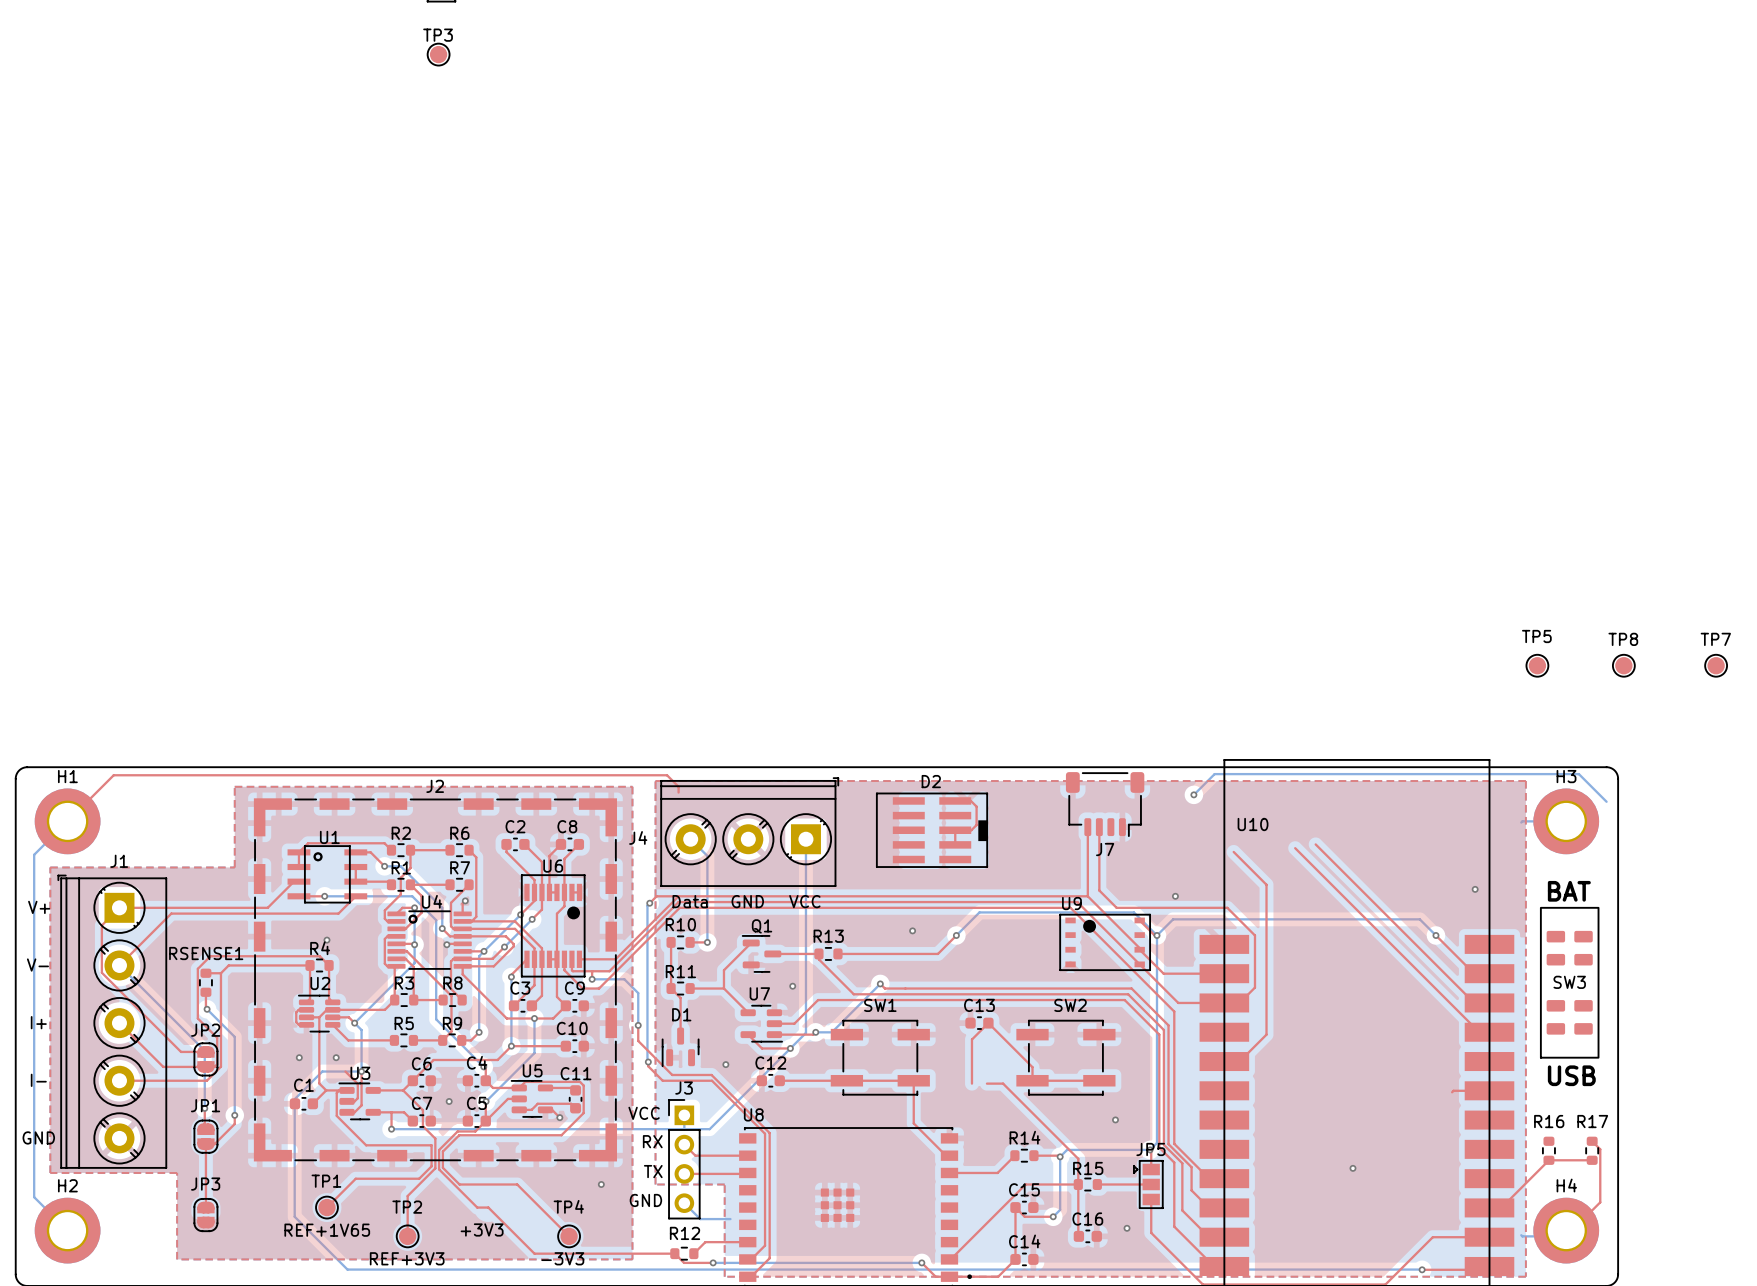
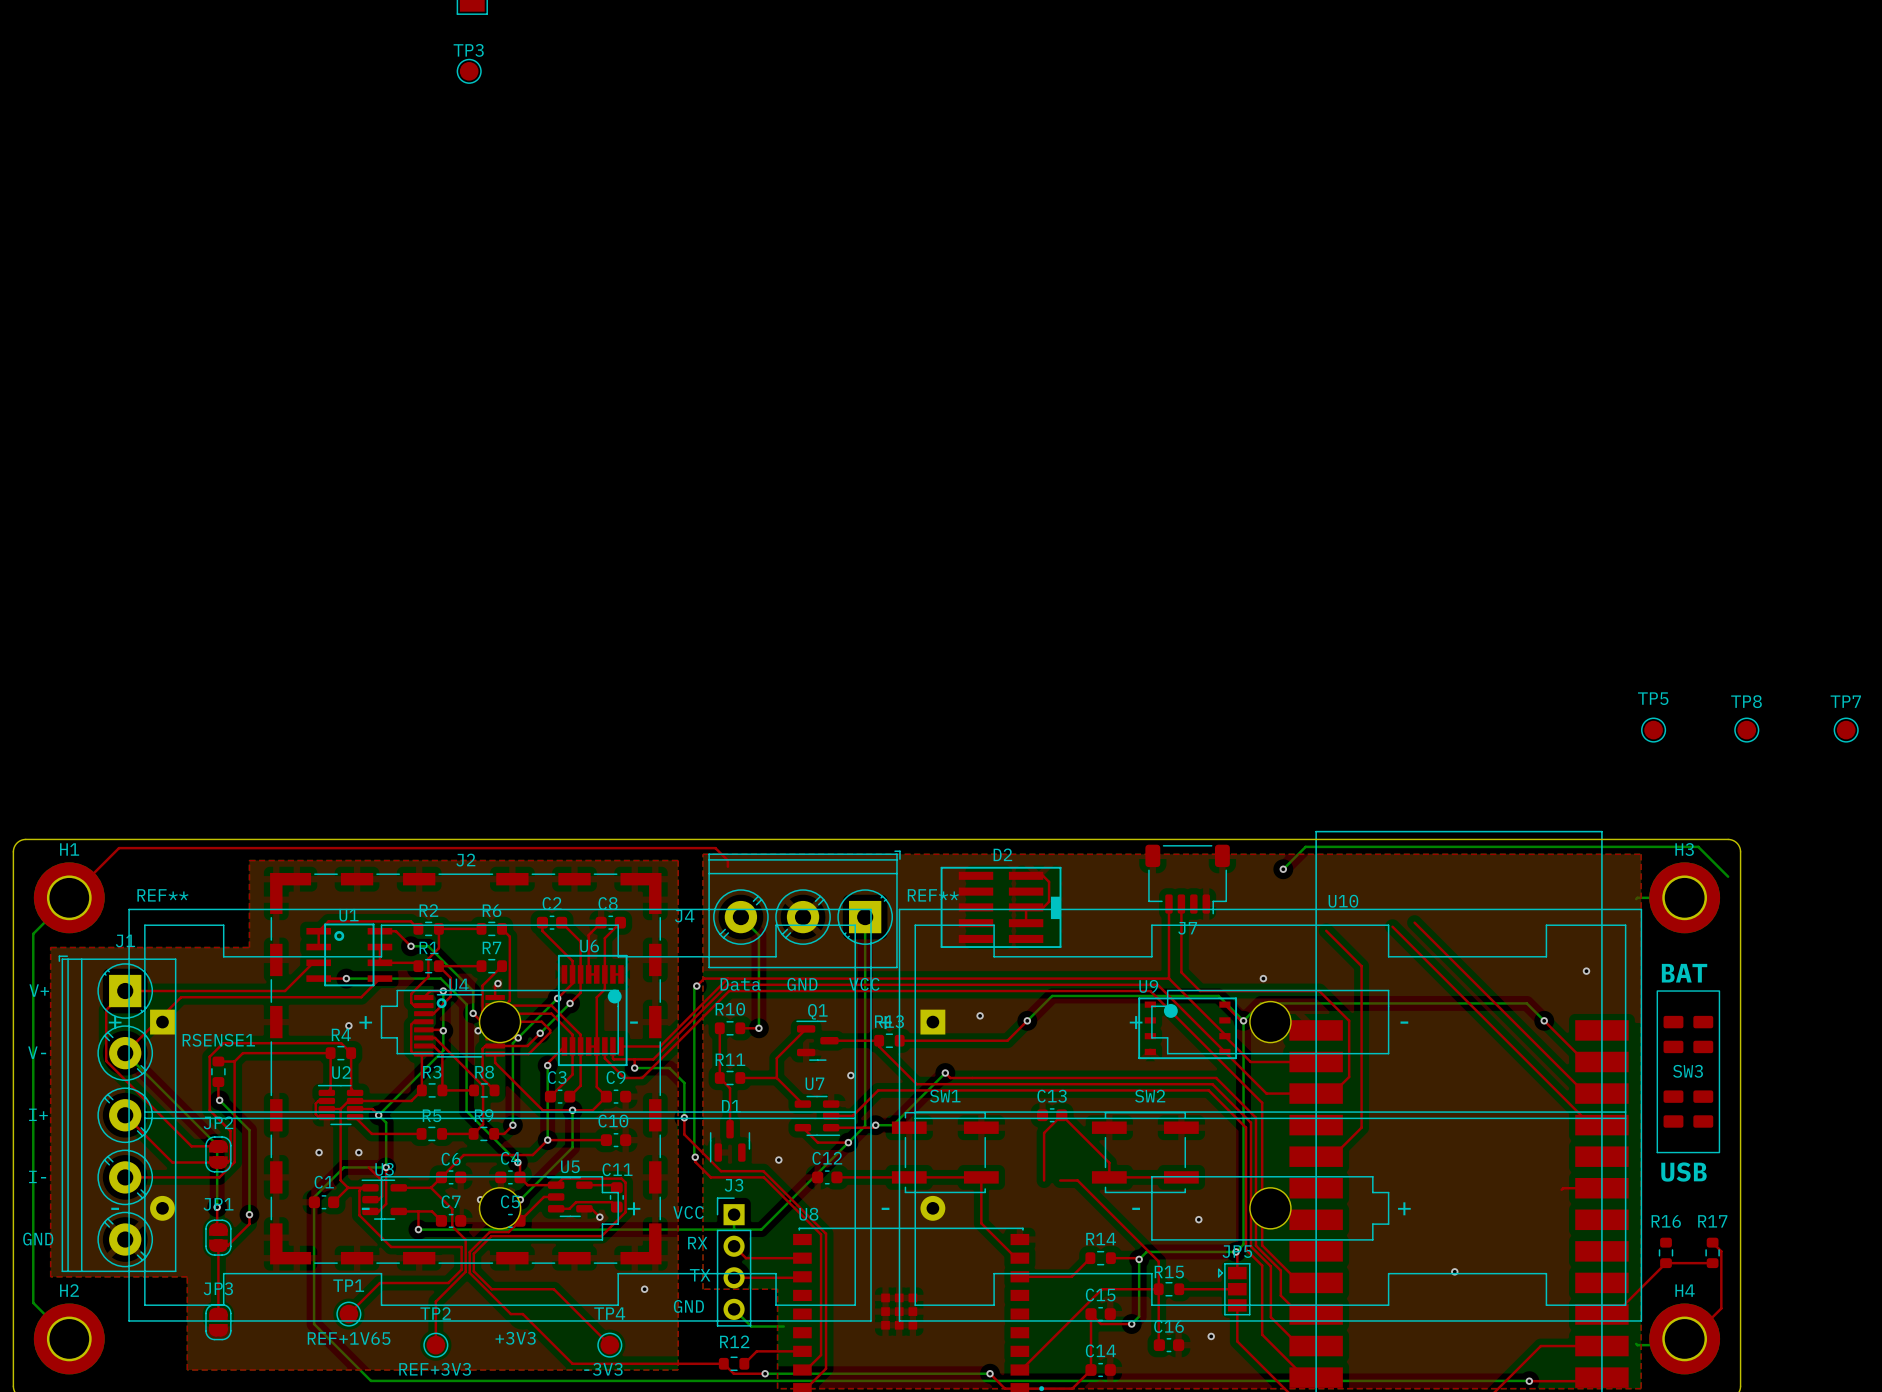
REF**: none -> (500, 1115)
REF**: none -> (1270, 1115)

